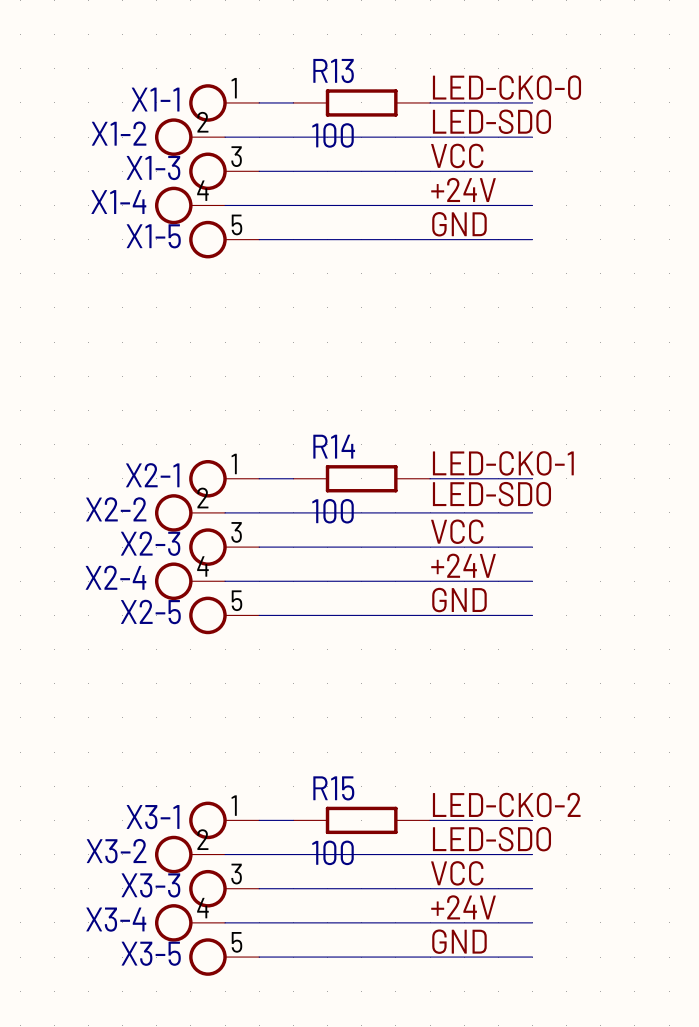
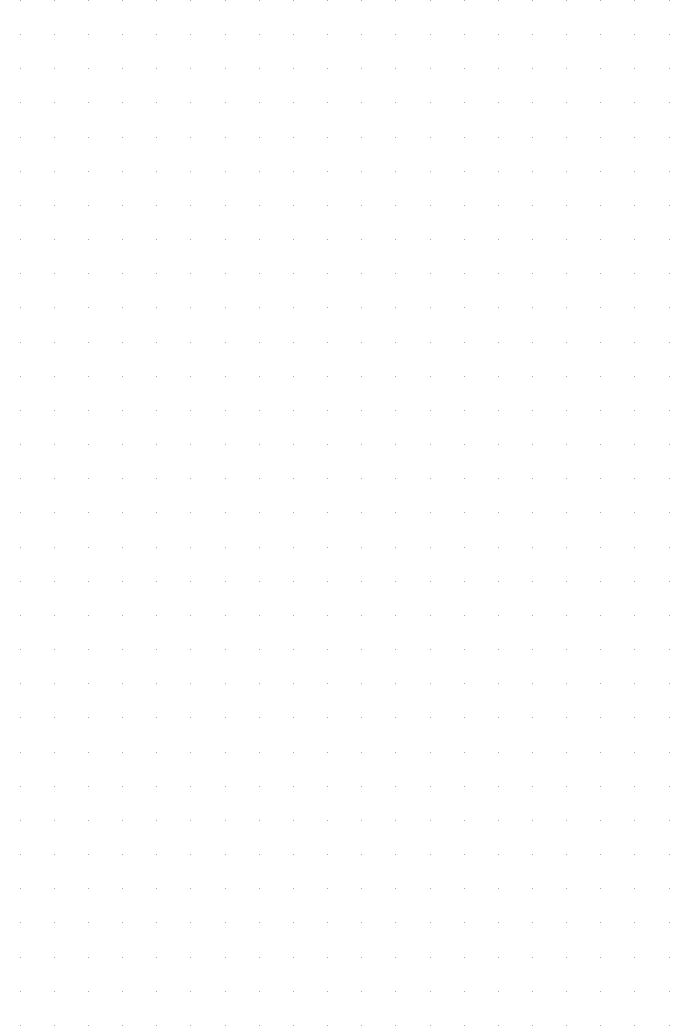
label: LED-CKO-0 (506, 87) -> none
X1-1: (224, 102) -> none
wire: (259, 102) (293, 102) -> none
R13: 100 (361, 102) -> none
wire: (430, 102) (532, 102) -> none
label: LED-SDO (491, 121) -> none
X1-2: (190, 137) -> none
wire: (225, 137) (532, 137) -> none
label: VCC (457, 155) -> none
X1-3: (224, 171) -> none
wire: (259, 171) (532, 171) -> none
label: +24V (463, 189) -> none
X1-4: (190, 205) -> none
wire: (225, 205) (532, 205) -> none
label: GND (459, 224) -> none
X1-5: (224, 239) -> none
wire: (259, 239) (532, 239) -> none
label: LED-CKO-1 (503, 463) -> none
X2-1: (224, 478) -> none
wire: (259, 478) (293, 478) -> none
R14: 100 (361, 478) -> none
wire: (430, 478) (532, 478) -> none
label: LED-SDO (491, 494) -> none
X2-2: (190, 512) -> none
wire: (225, 512) (532, 512) -> none
label: VCC (457, 531) -> none
X2-3: (224, 547) -> none
wire: (259, 547) (532, 547) -> none
label: +24V (463, 565) -> none
X2-4: (190, 581) -> none
wire: (225, 581) (532, 581) -> none
label: GND (459, 600) -> none
X2-5: (224, 615) -> none
wire: (259, 615) (532, 615) -> none
label: LED-CKO-2 (506, 805) -> none
X3-1: (224, 820) -> none
wire: (259, 820) (293, 820) -> none
R15: 100 (361, 820) -> none
wire: (430, 820) (532, 820) -> none
label: LED-SDO (491, 839) -> none
X3-2: (190, 854) -> none
wire: (225, 854) (532, 854) -> none
label: VCC (457, 873) -> none
X3-3: (224, 888) -> none
wire: (259, 888) (532, 888) -> none
label: +24V (463, 907) -> none
X3-4: (190, 922) -> none
wire: (225, 922) (532, 922) -> none
label: GND (459, 941) -> none
X3-5: (224, 957) -> none
wire: (259, 957) (532, 957) -> none

